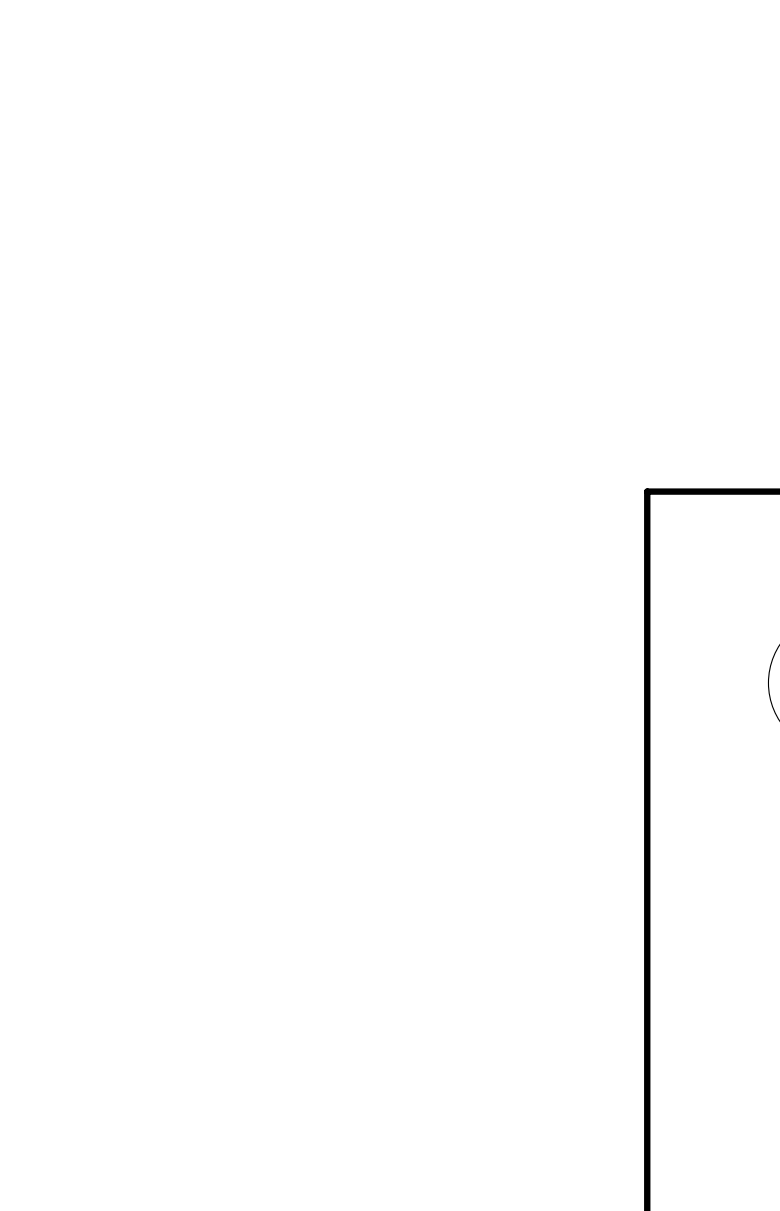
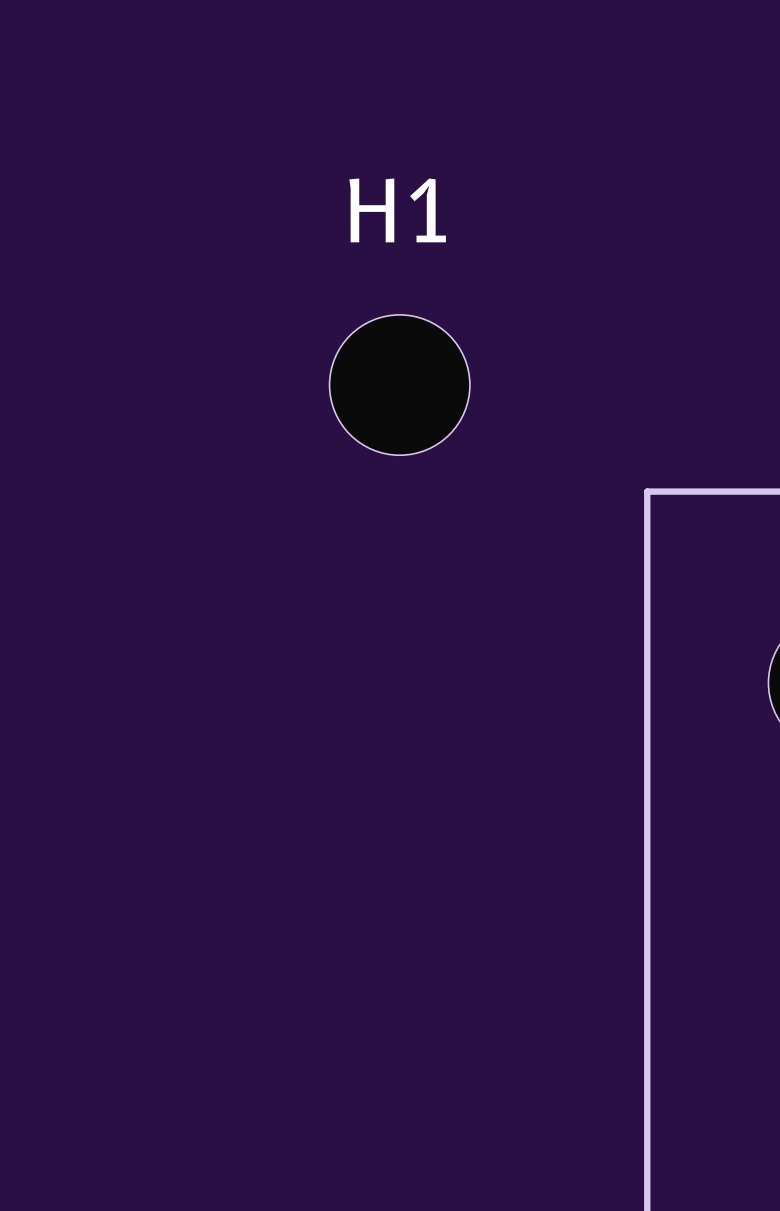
H1: none -> (399, 385)

